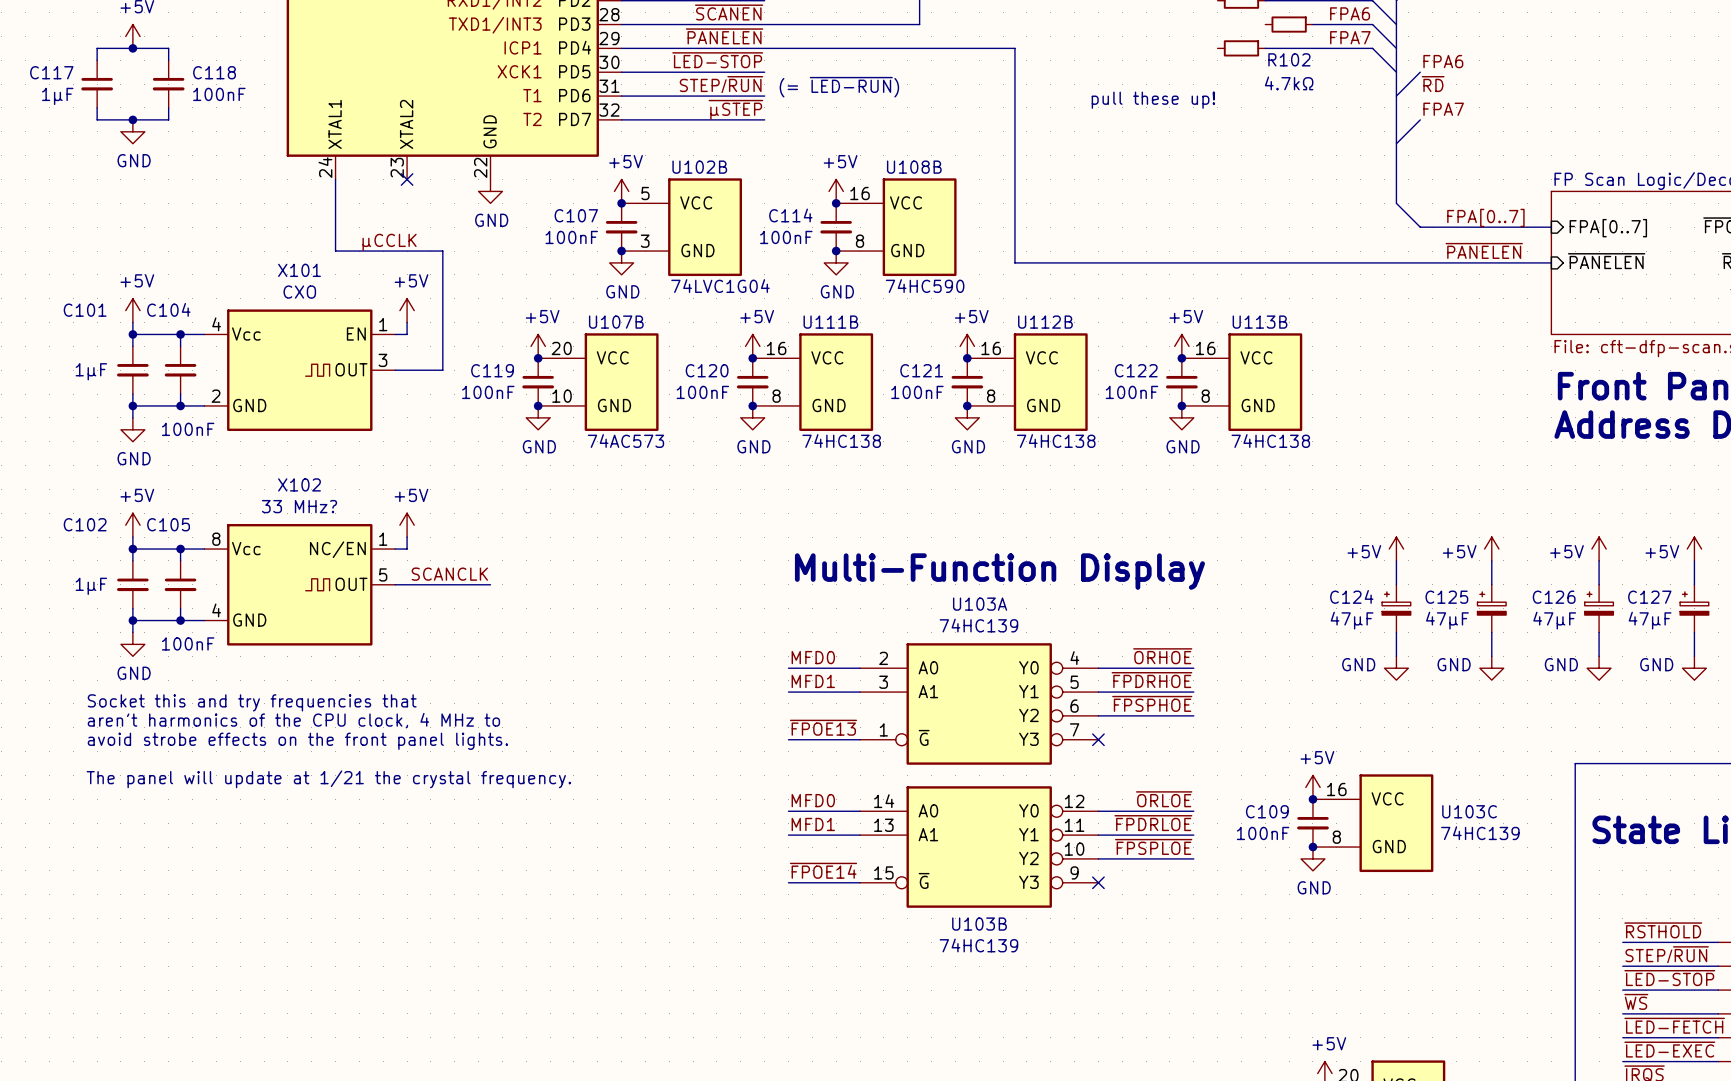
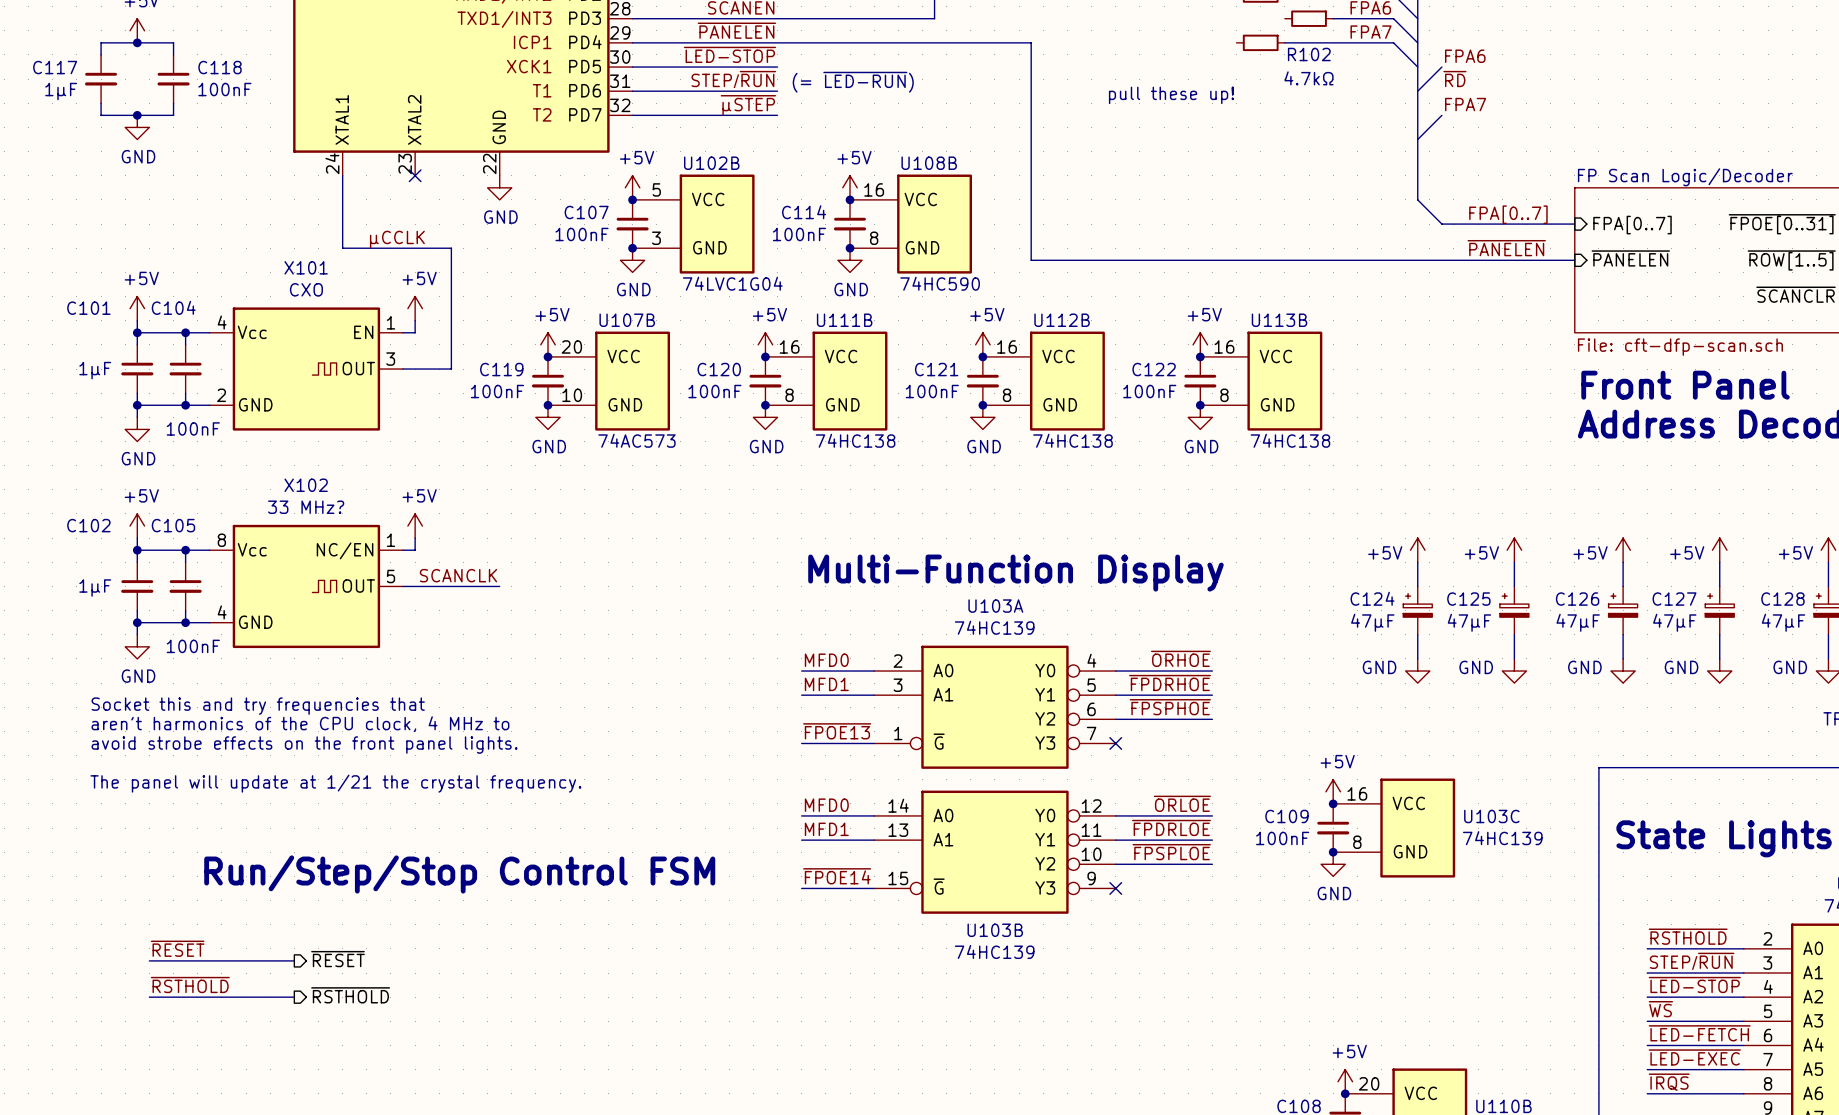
text: none -> Run/Step/Stop Control FSM (459, 874)
label: none -> ~{RESET} (177, 948)
sheet pin: none -> ~{RESET} (337, 959)
wire: none -> (149, 960) (294, 960)
label: none -> ~{RSTHOLD} (190, 984)
sheet pin: none -> ~{RSTHOLD} (350, 995)
wire: none -> (149, 997) (294, 997)

